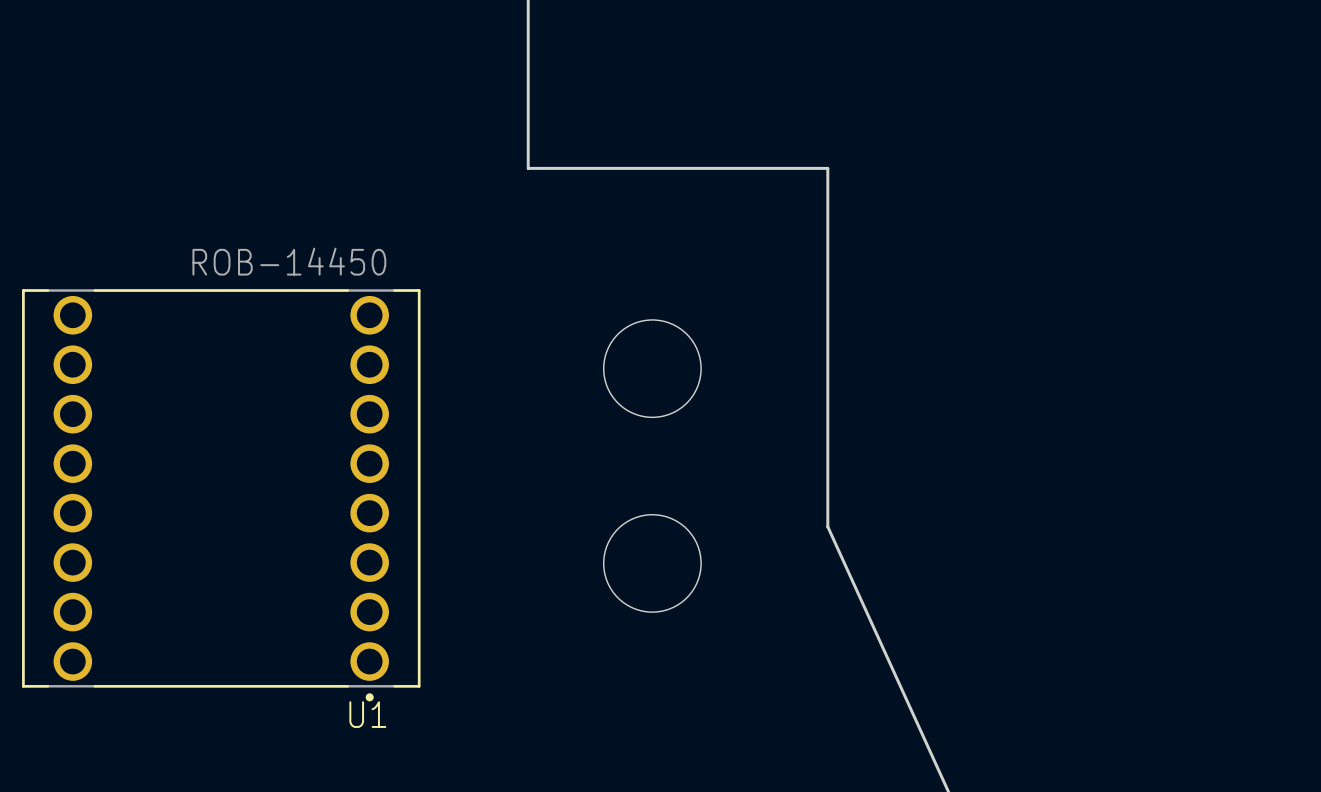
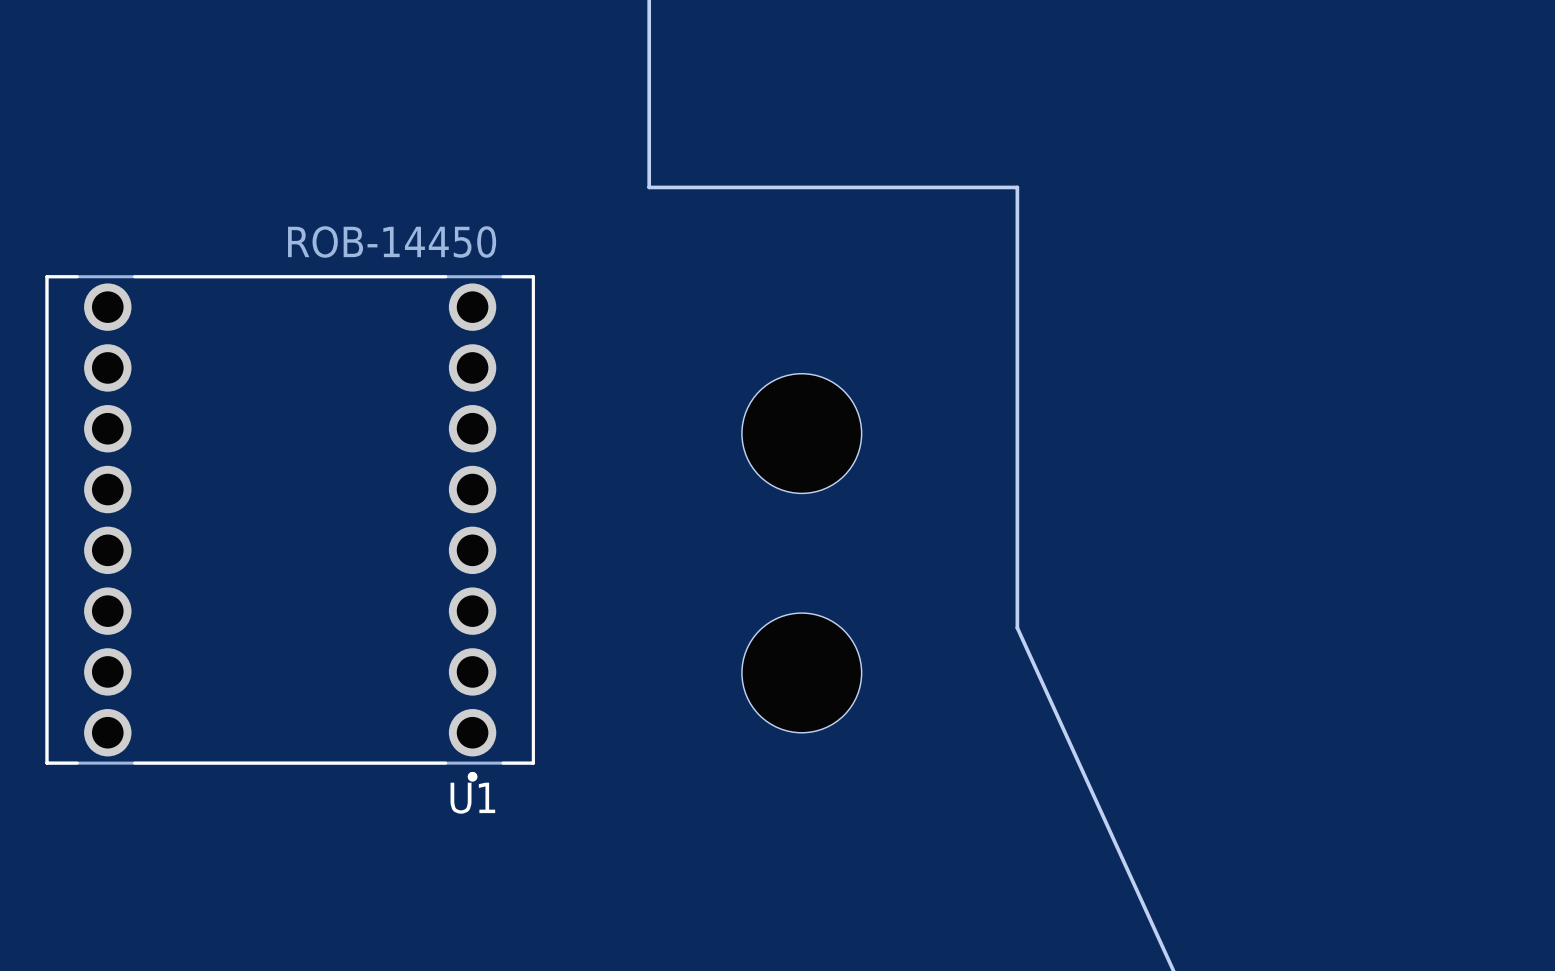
U1 position: (221, 495) -> (290, 528)

